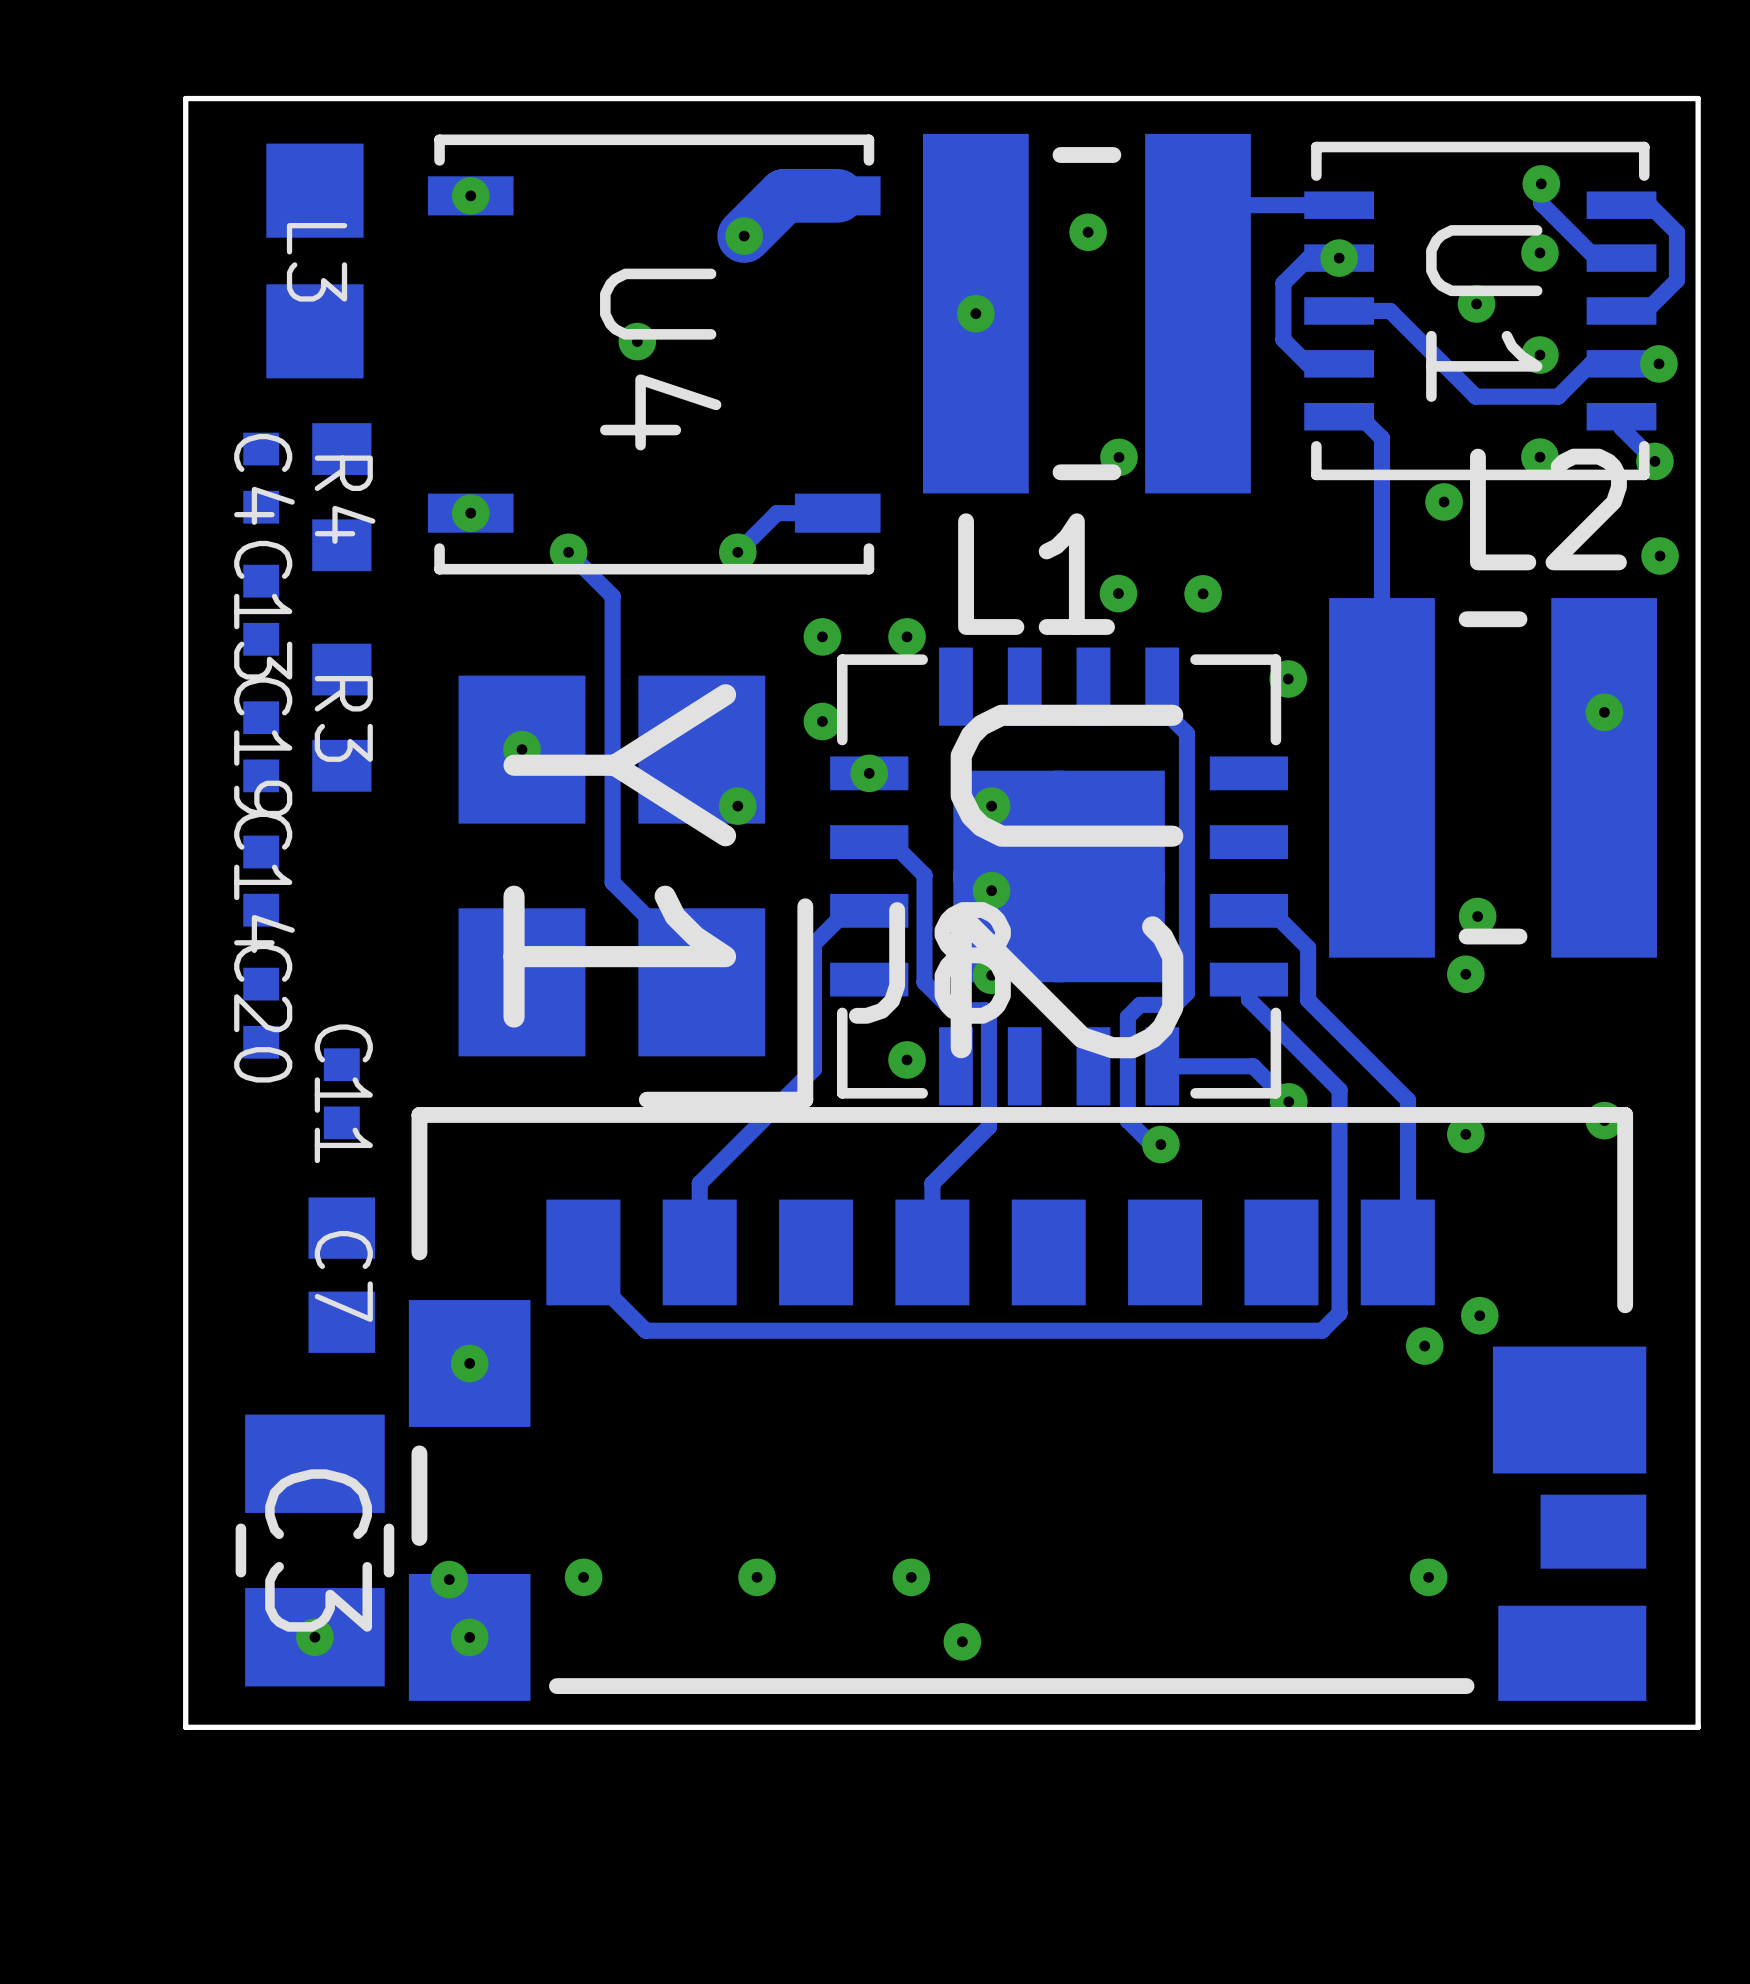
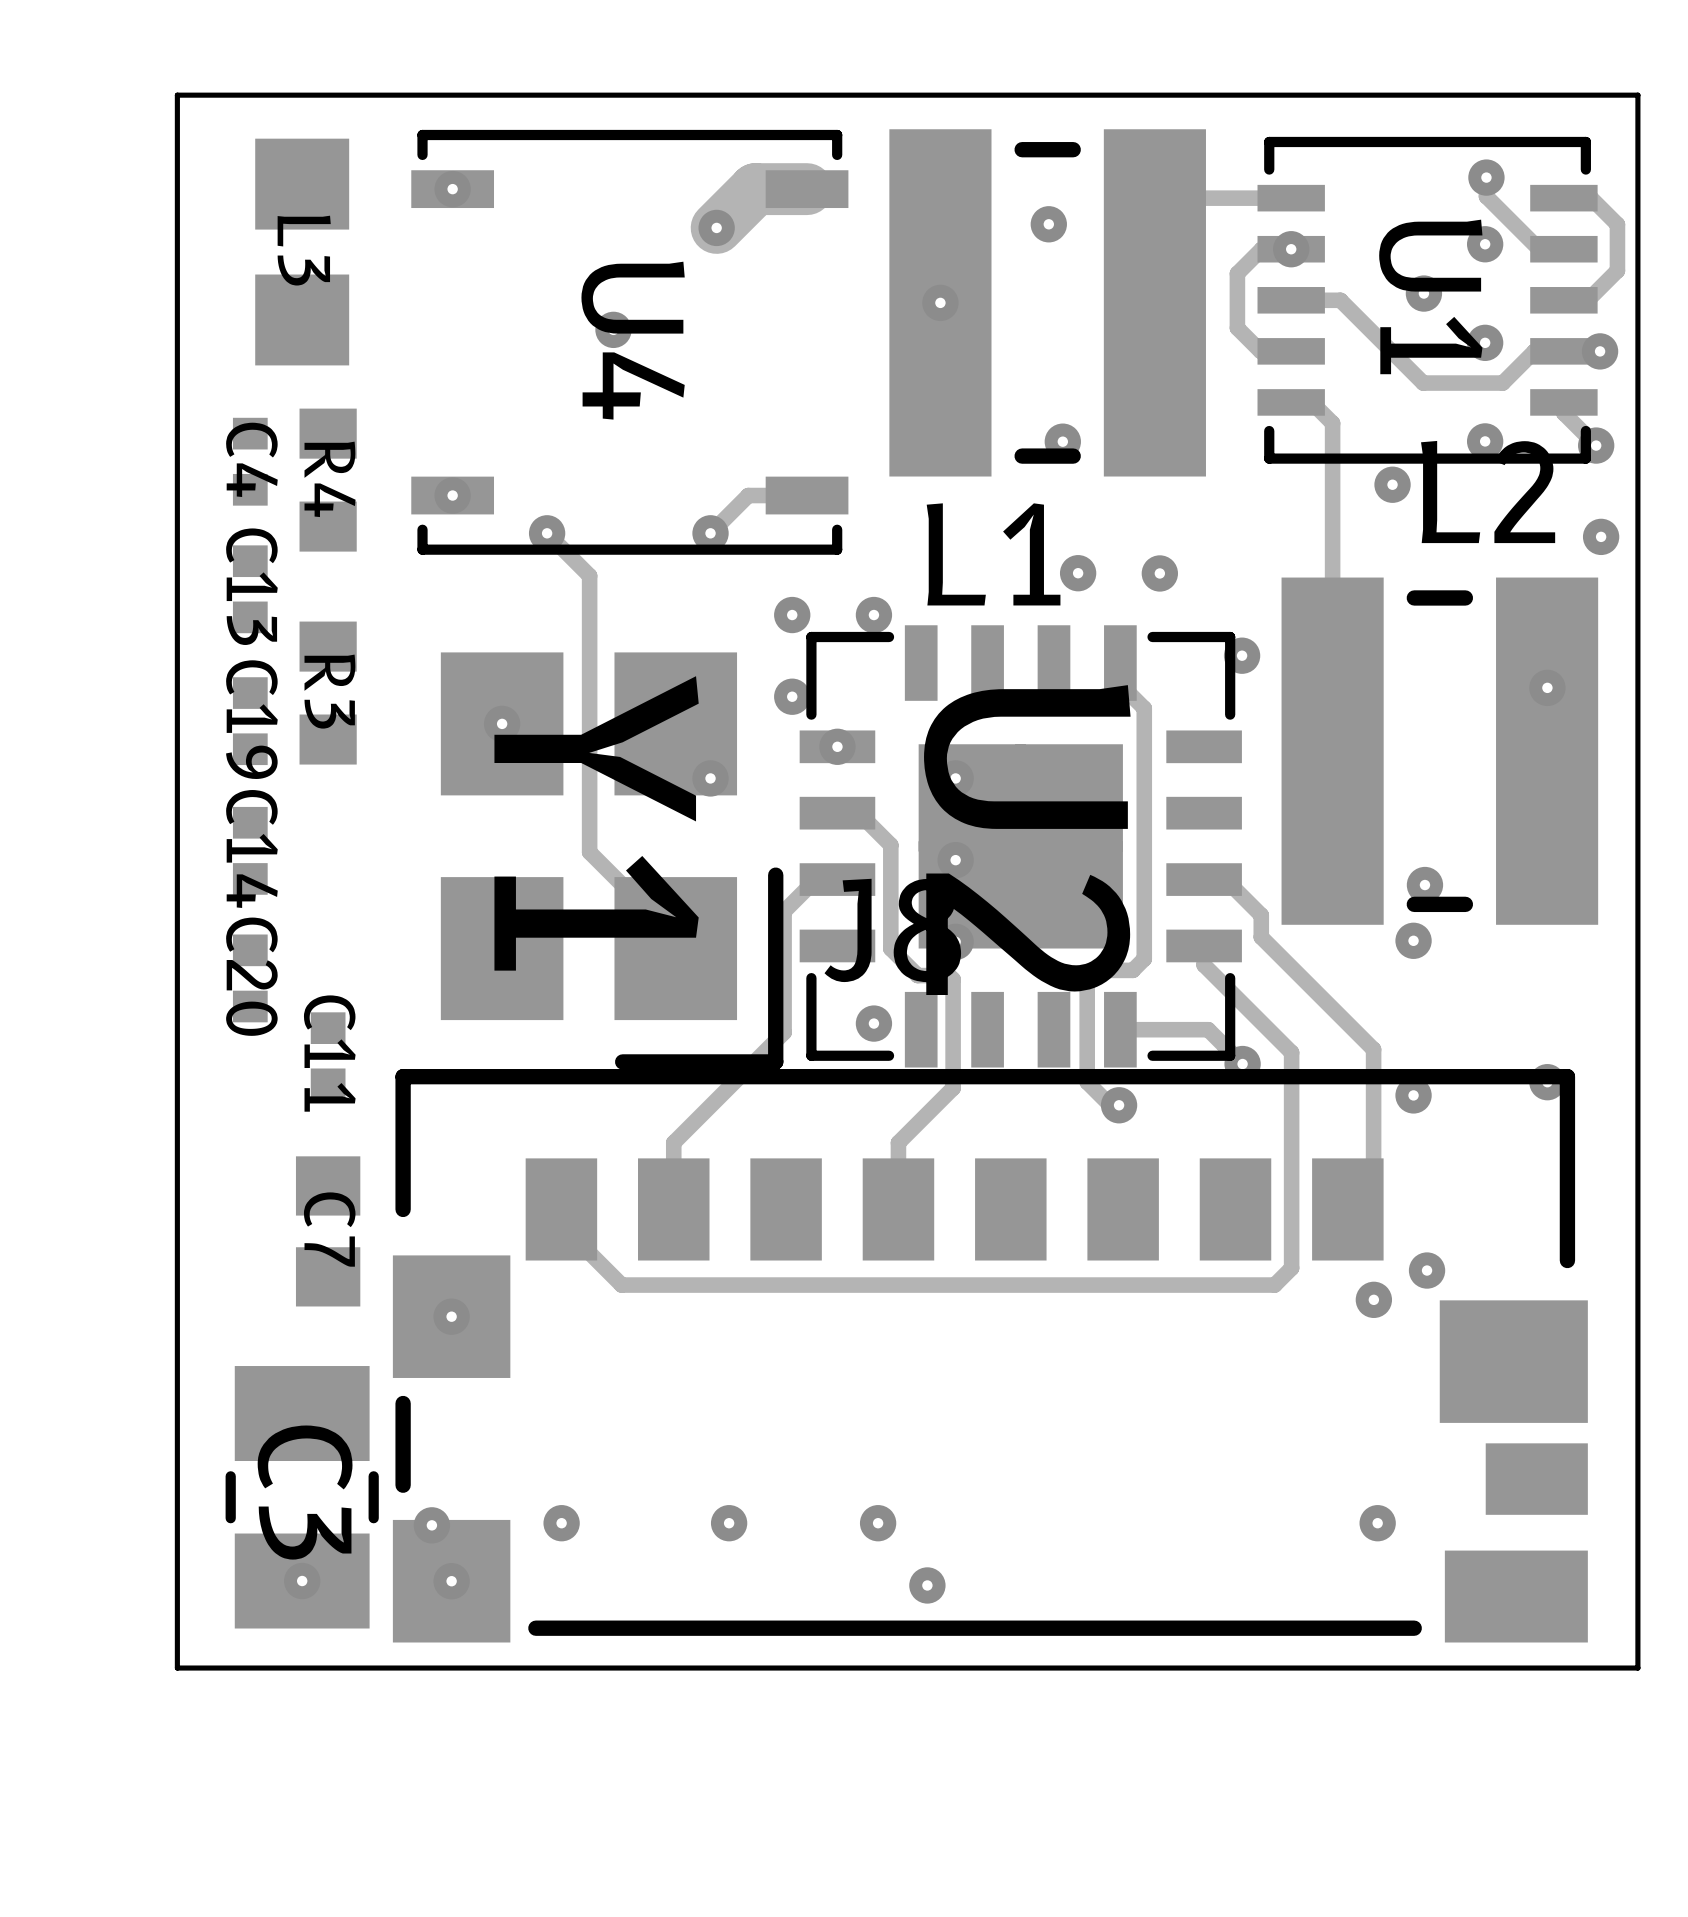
via position: (1119, 457) -> (1062, 441)
track: (1308, 970) (1308, 1000) (1408, 1100) (1408, 1242) -> (1261, 937) (1373, 1049) (1373, 1183) (1357, 1199)

